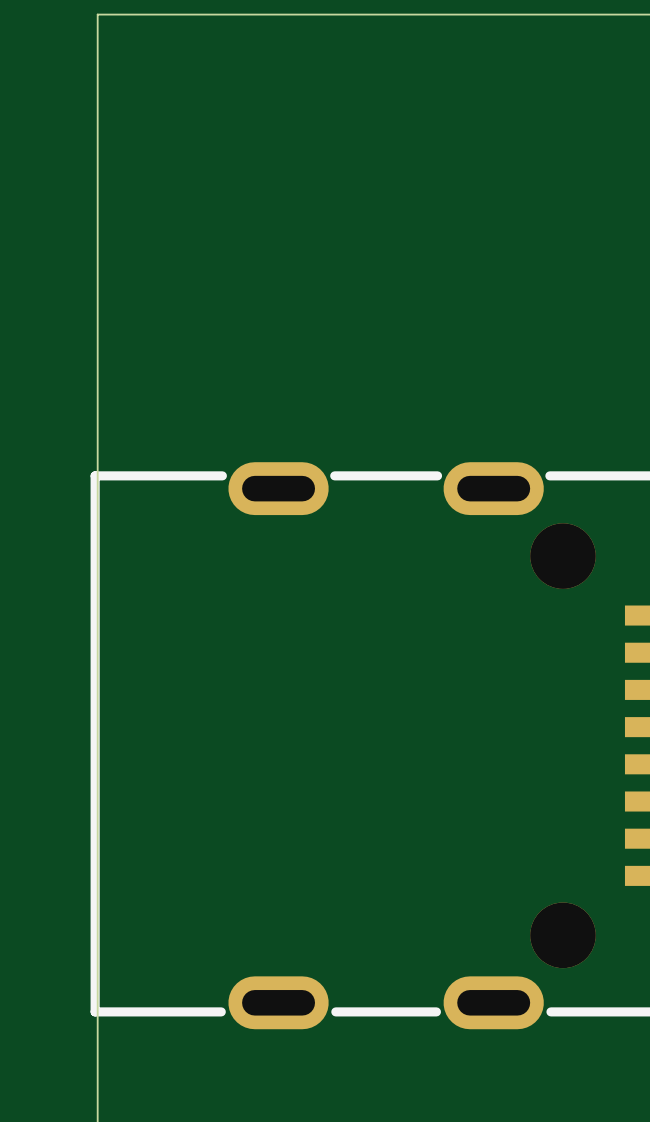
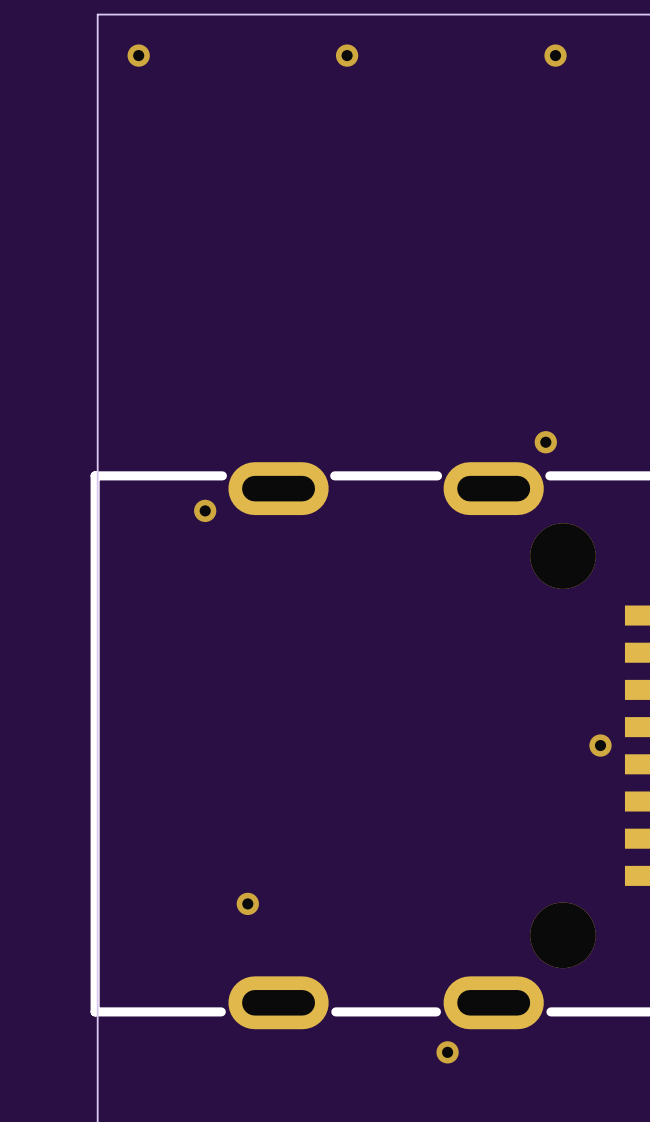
via: none -> (138, 55)
via: none -> (347, 55)
via: none -> (555, 55)
via: none -> (545, 442)
via: none -> (205, 510)
via: none -> (600, 745)
via: none -> (247, 903)
via: none -> (447, 1052)

